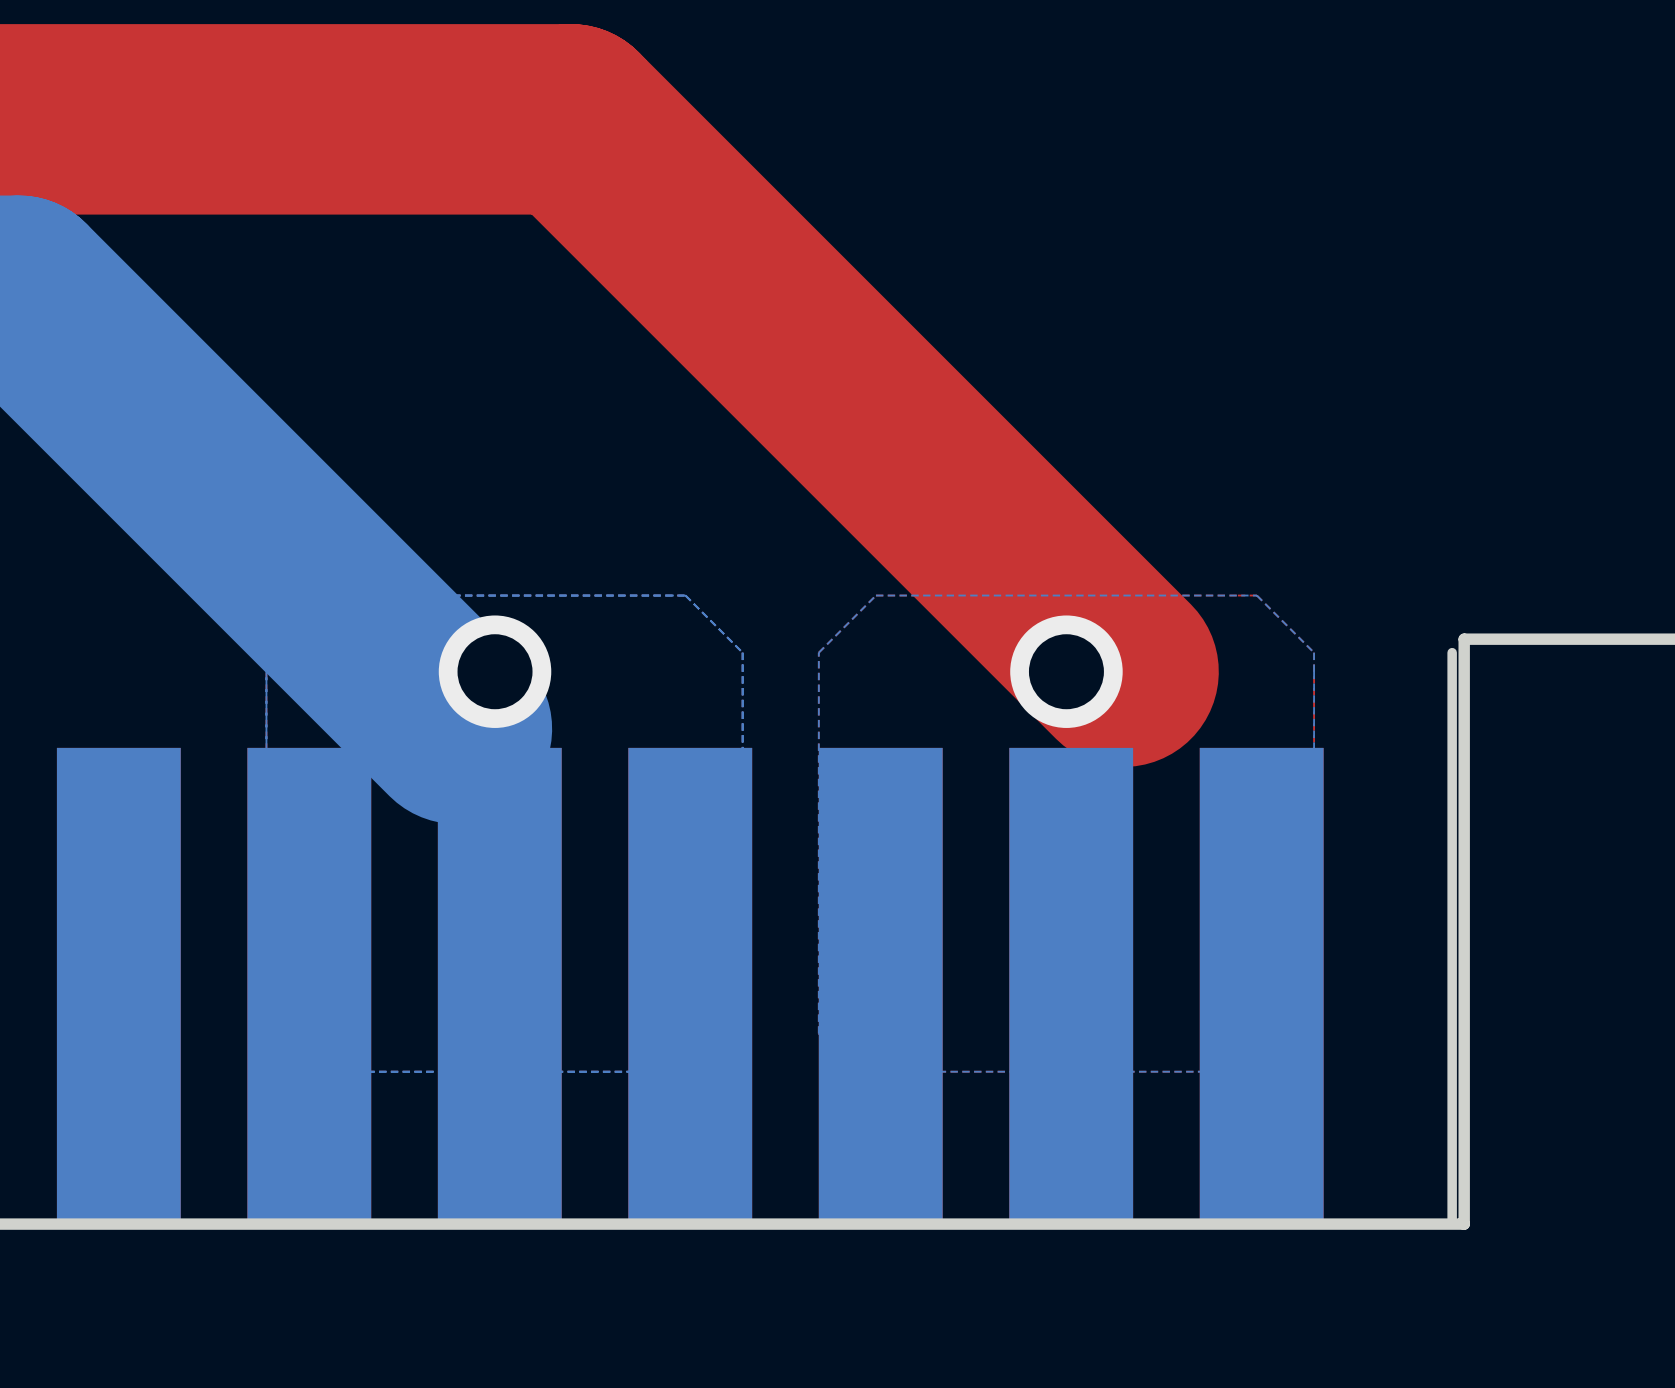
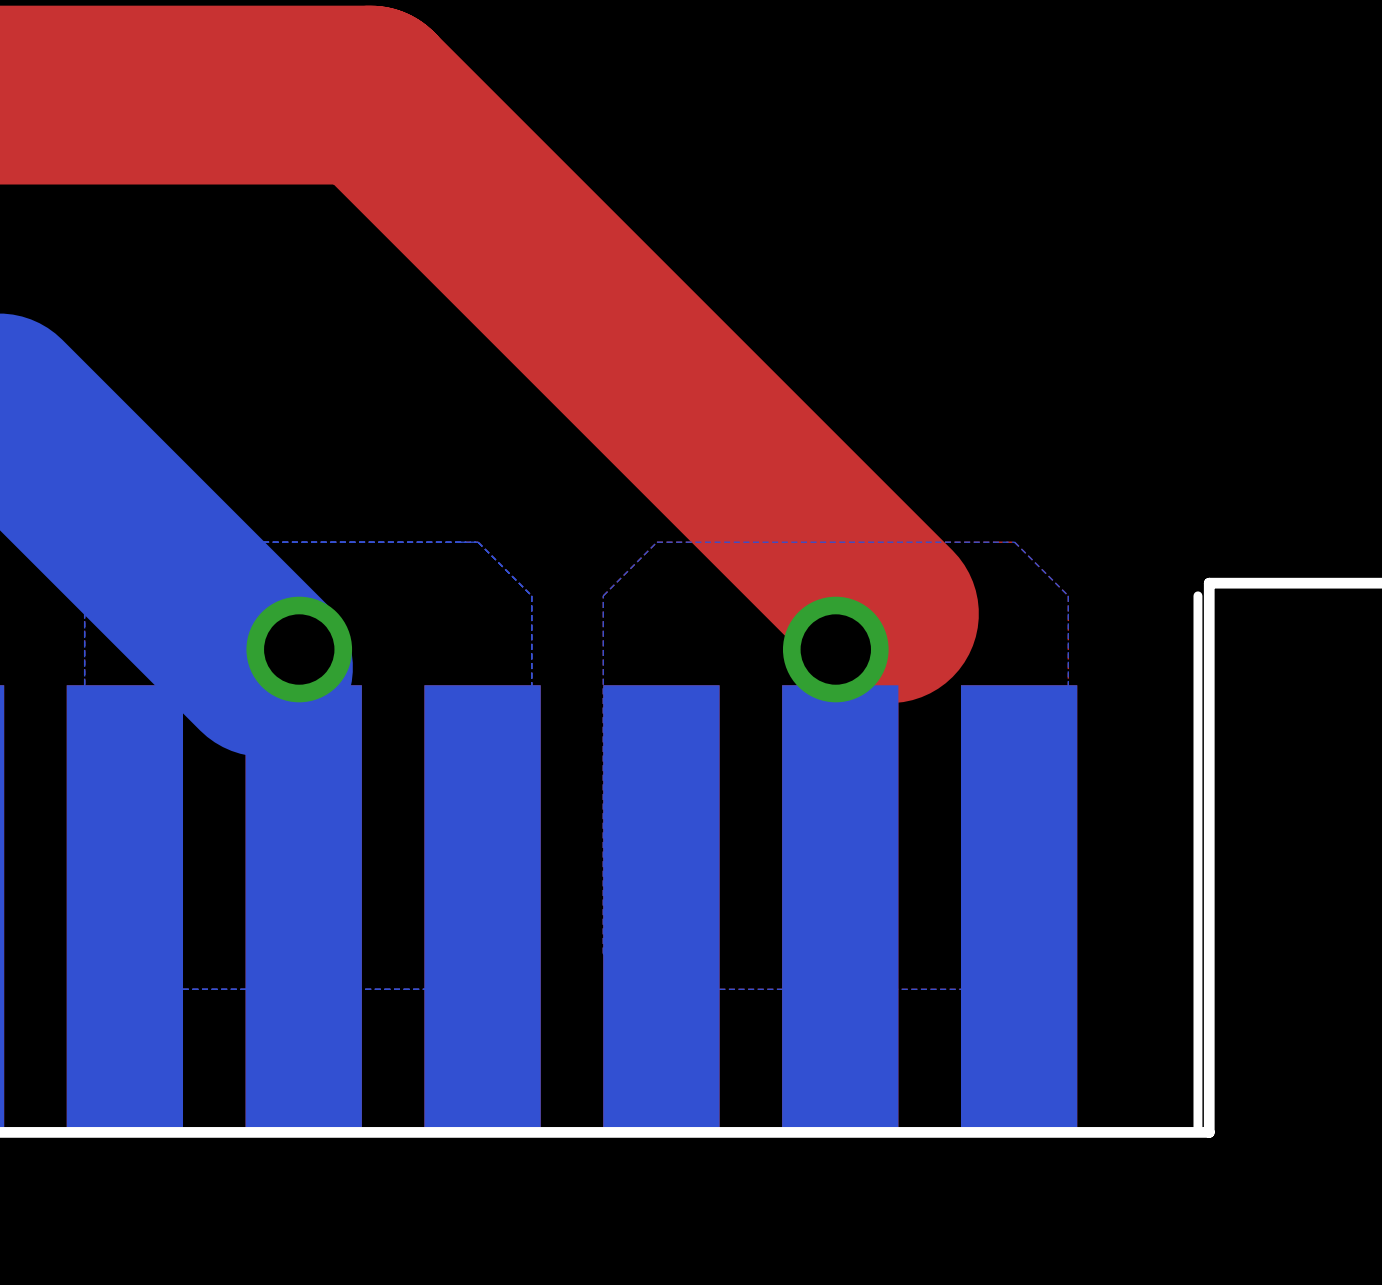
via position: (495, 671) -> (299, 649)
via position: (1066, 671) -> (835, 649)

